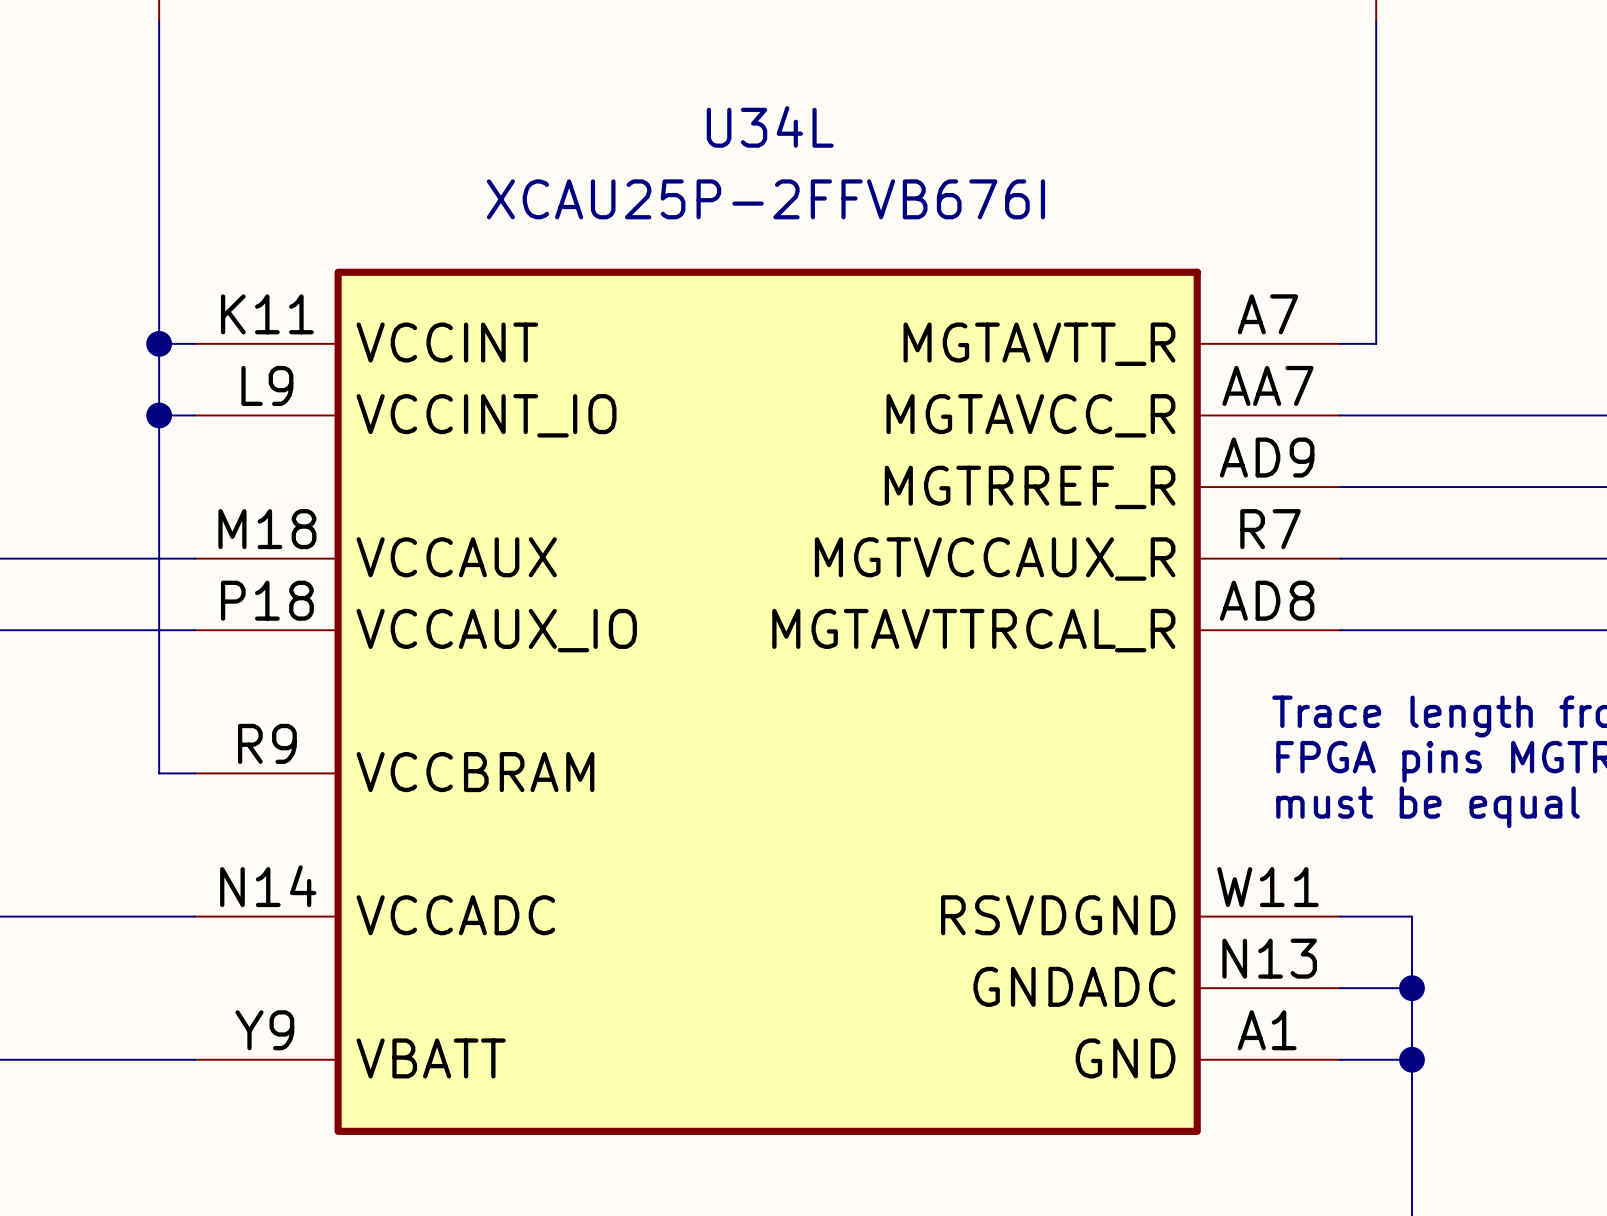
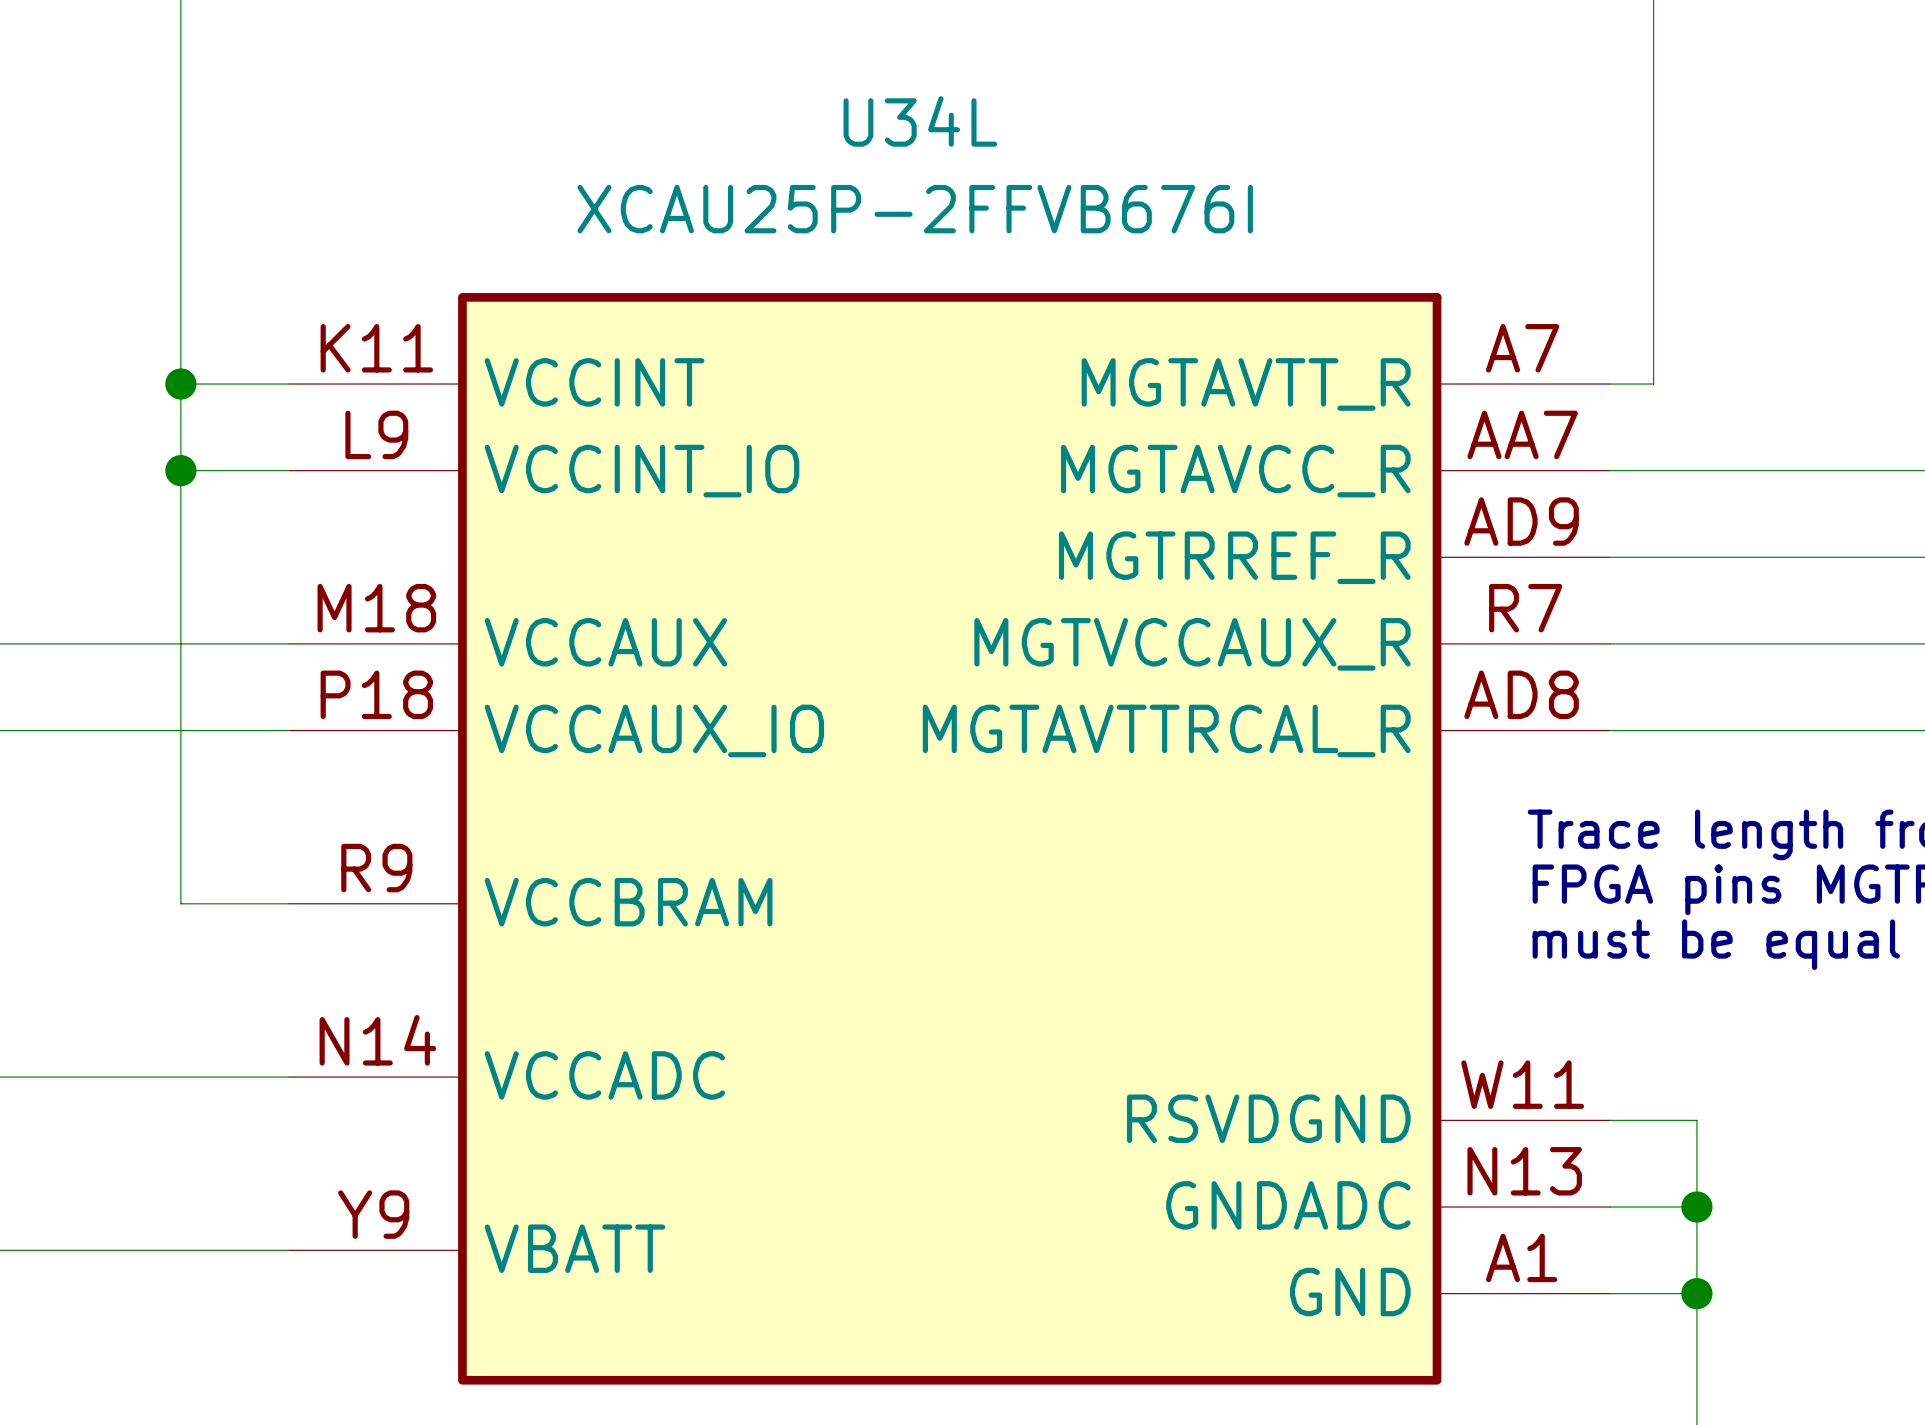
U34L symbol: [194, 268, 1341, 1135] -> [289, 293, 1611, 1385]
wire: (1340, 916) (1412, 916) (1412, 952) -> (1610, 1120) (1696, 1120)
wire: (1340, 988) (1412, 988) -> (1610, 1207) (1696, 1207)
junction: (1412, 988) -> none
junction: none -> (1696, 1207)
wire: (1340, 1059) (1412, 1059) -> (1610, 1293) (1696, 1293)
junction: (1412, 1059) -> none
junction: none -> (1696, 1293)

